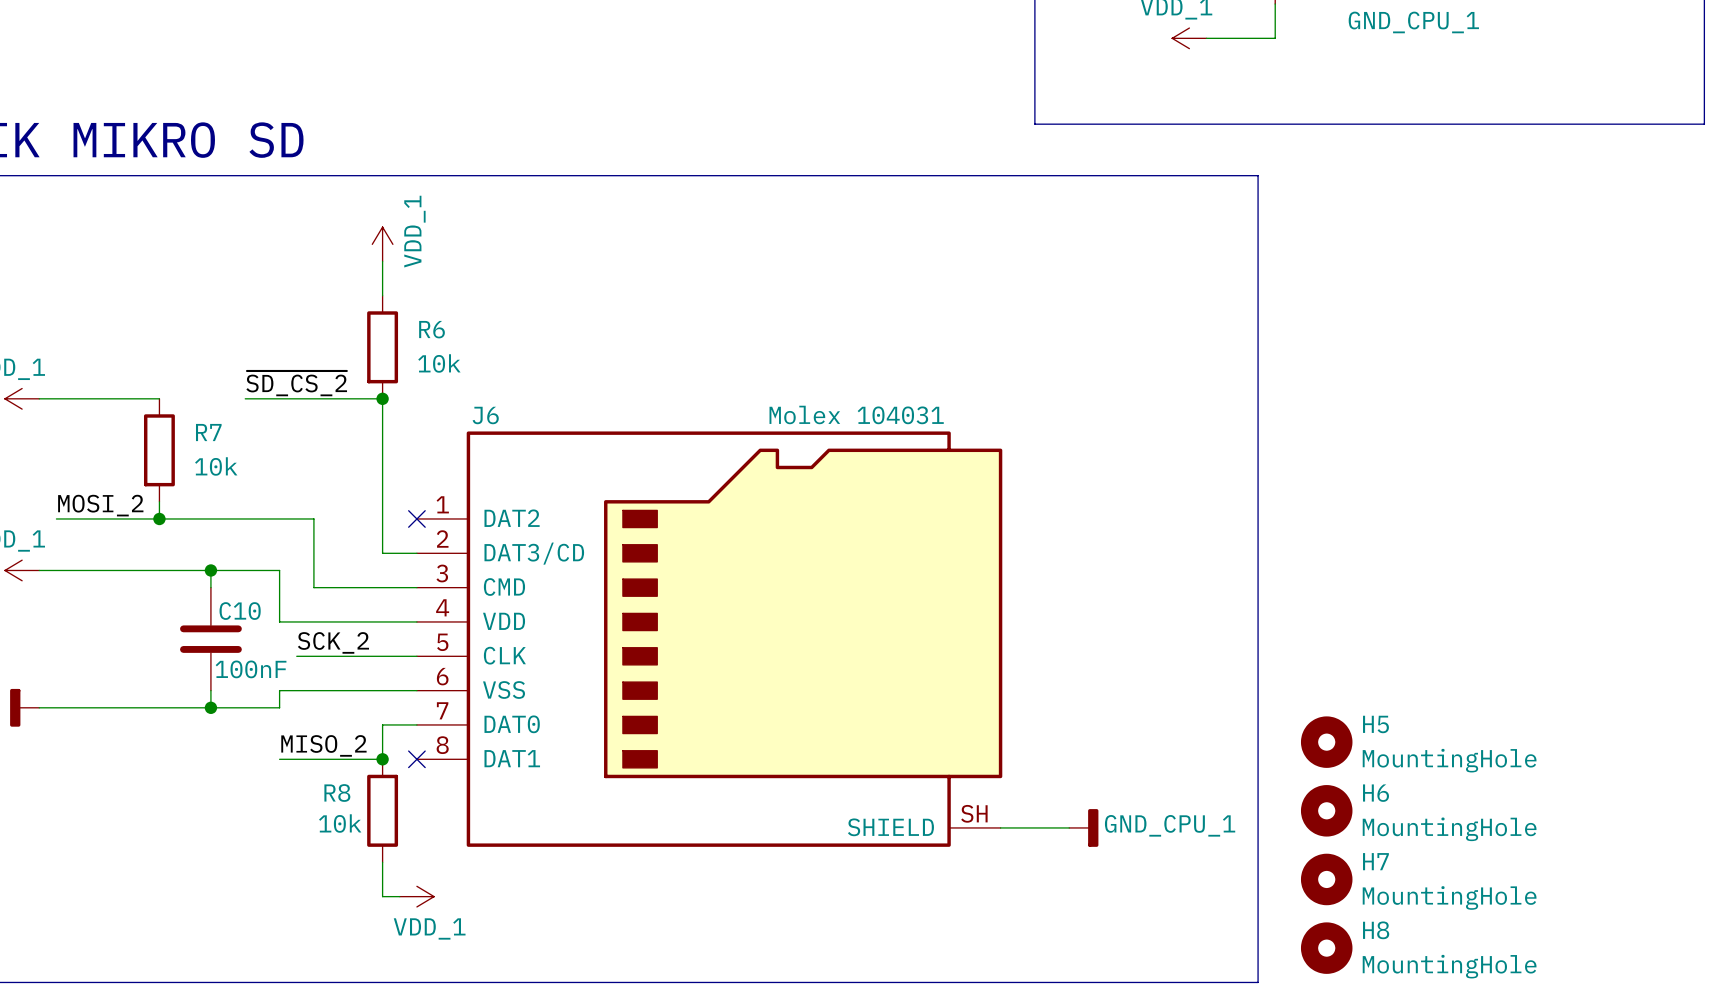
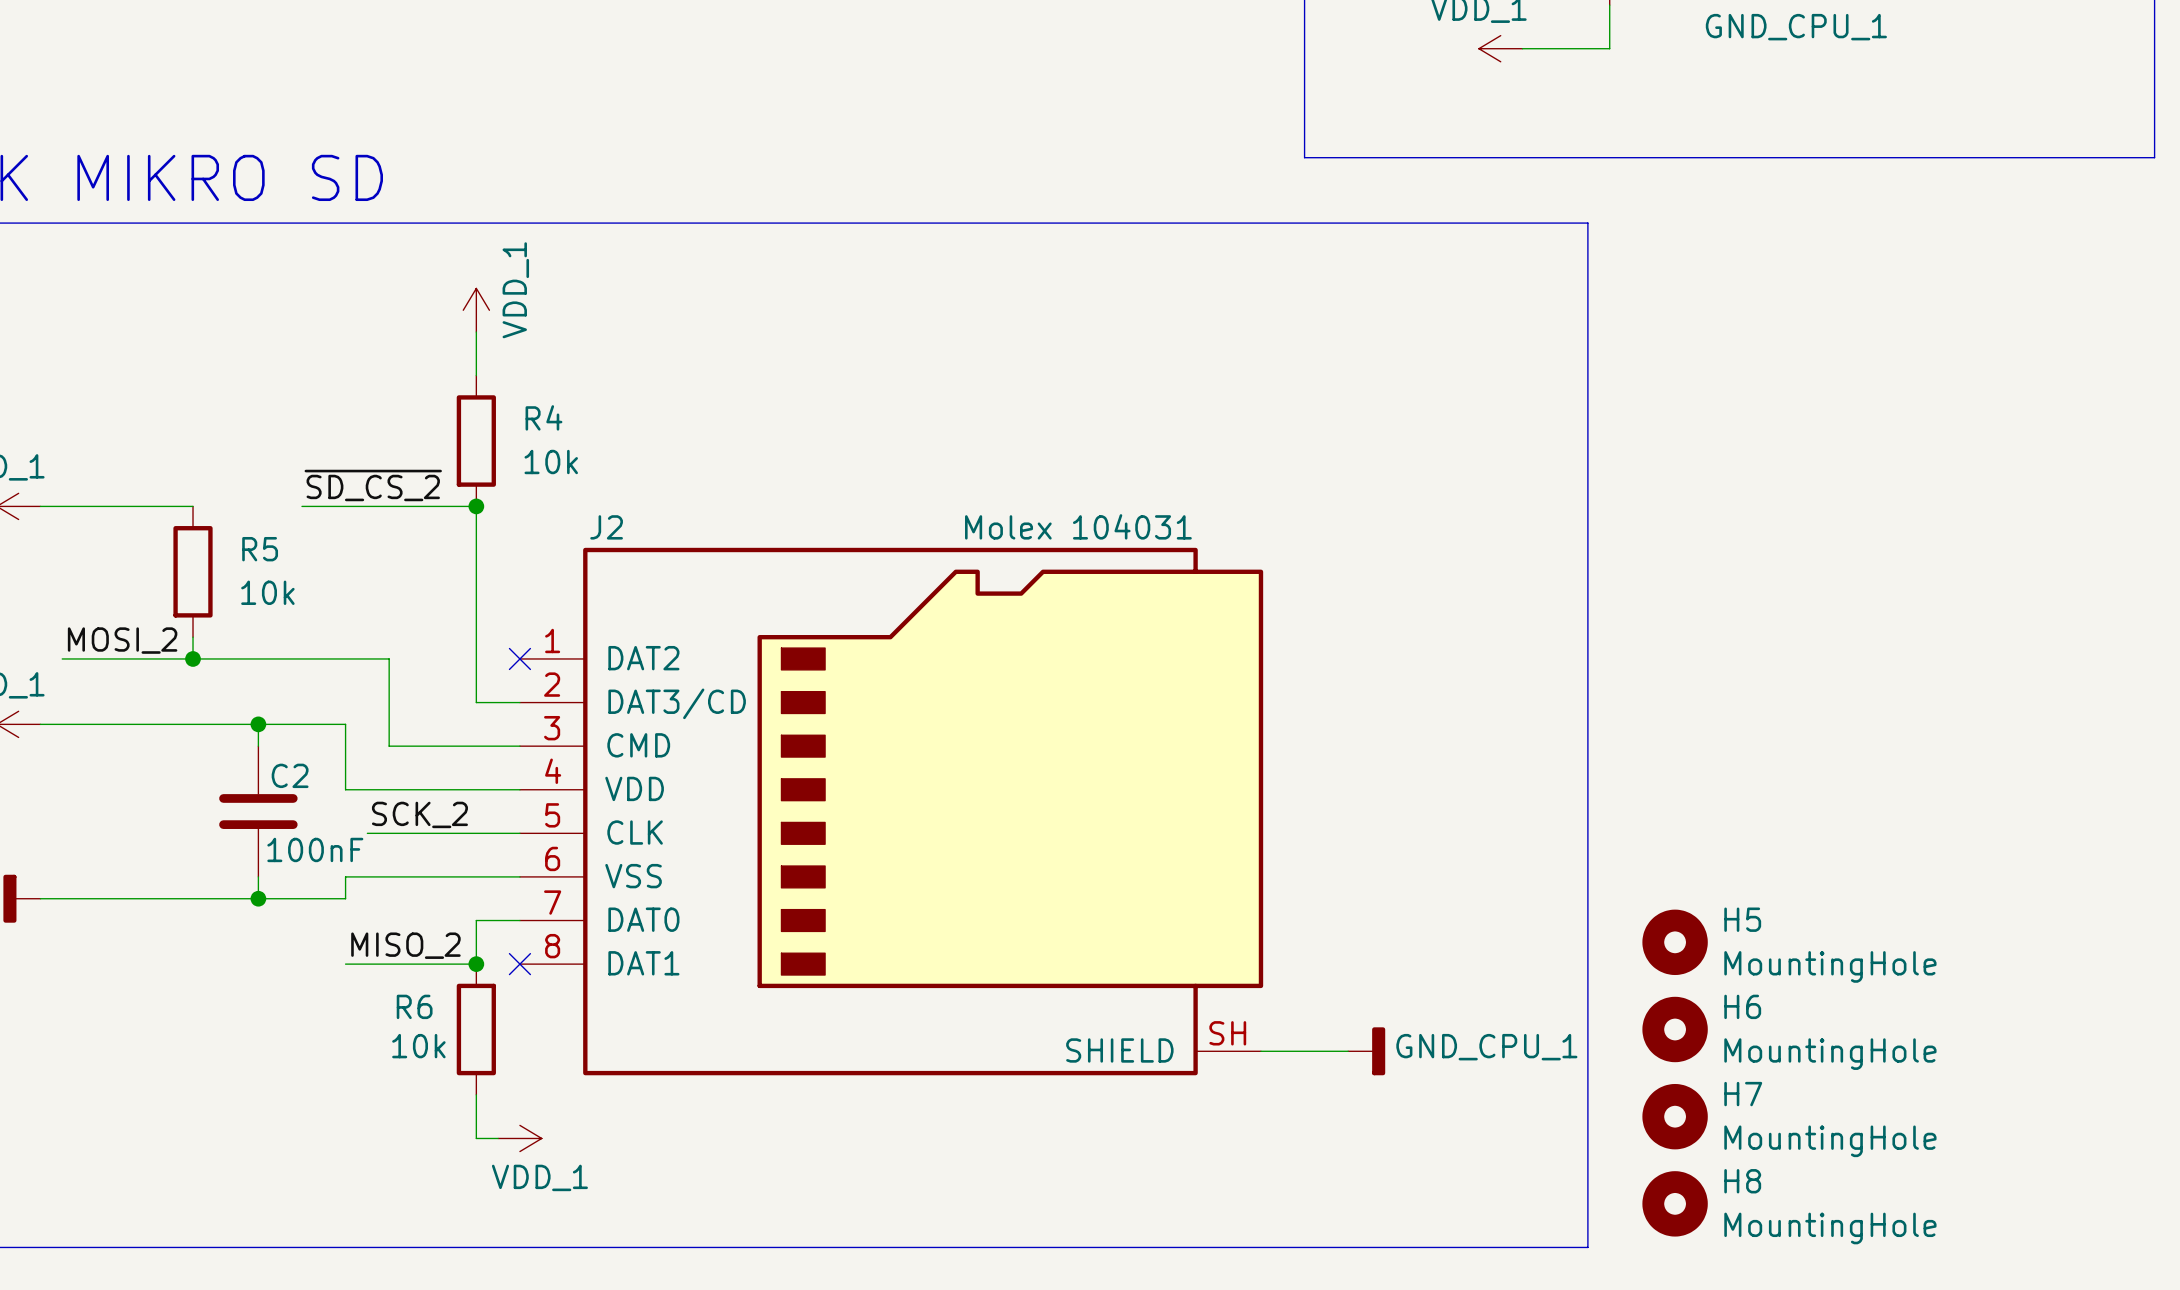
R6 name: R6 (432, 329) -> R4 (543, 417)
J6 name: J6 (485, 415) -> J2 (606, 527)
R7 name: R7 (208, 432) -> R5 (260, 549)
C10 name: C10 (240, 611) -> C2 (290, 775)
R8 name: R8 (337, 792) -> R6 (414, 1006)

